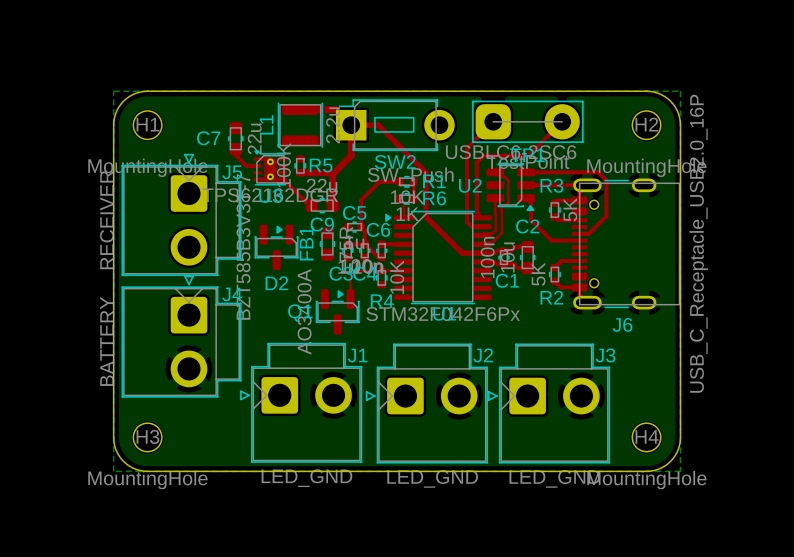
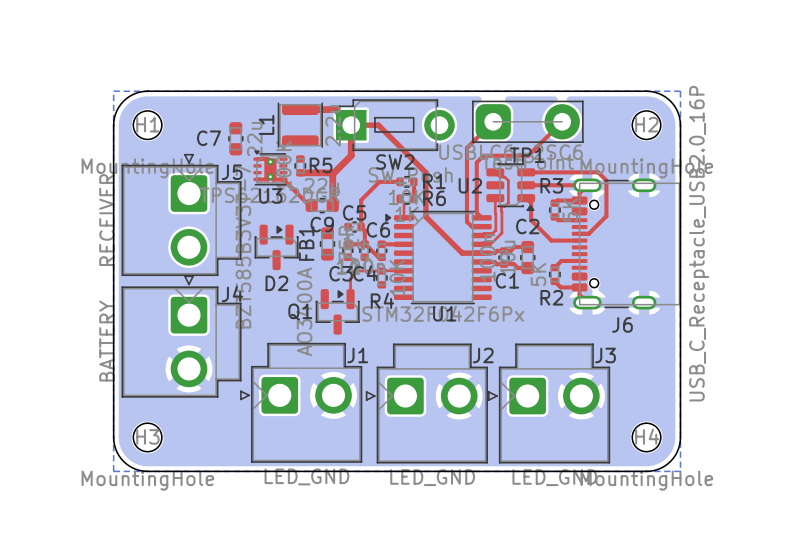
top track: (235, 149) (235, 155) (246, 165) (257, 165) -> none

